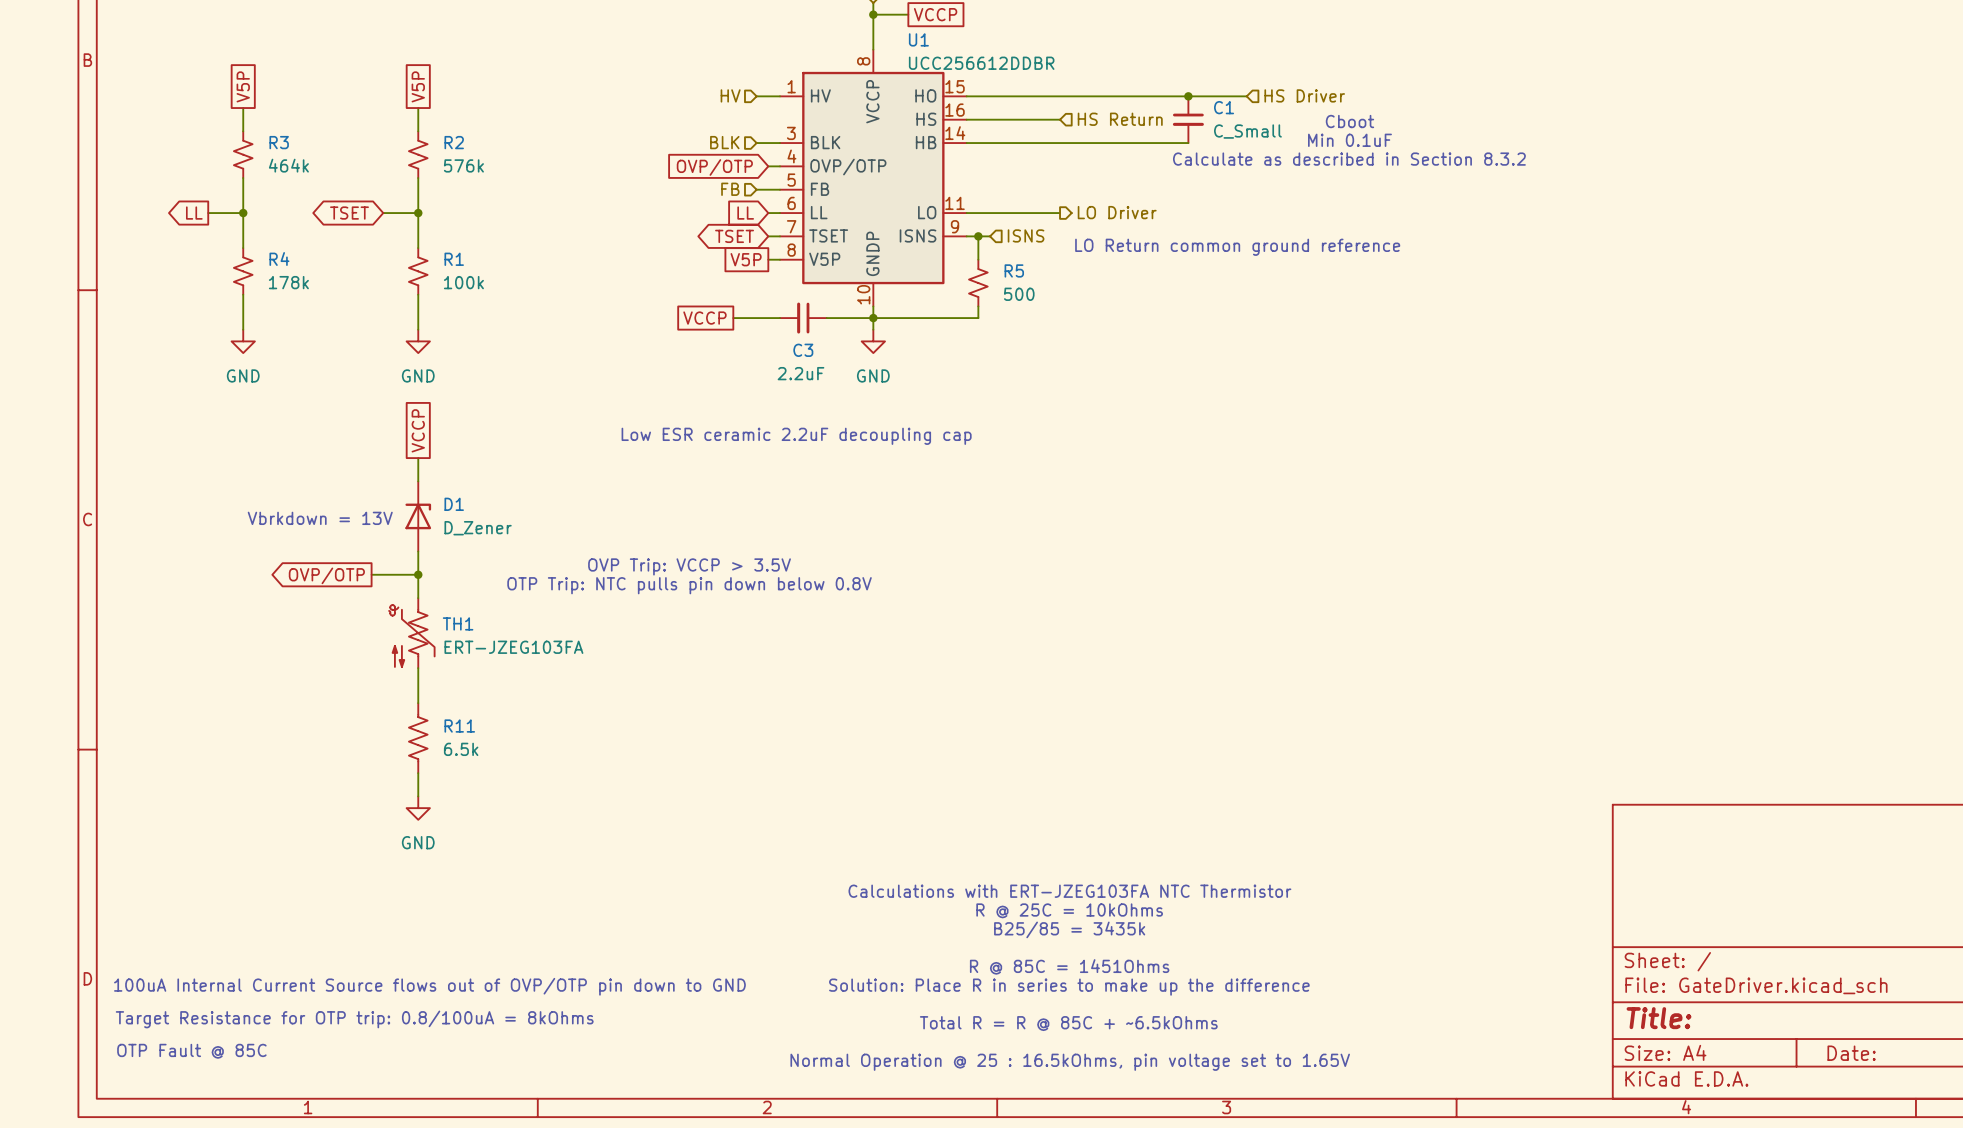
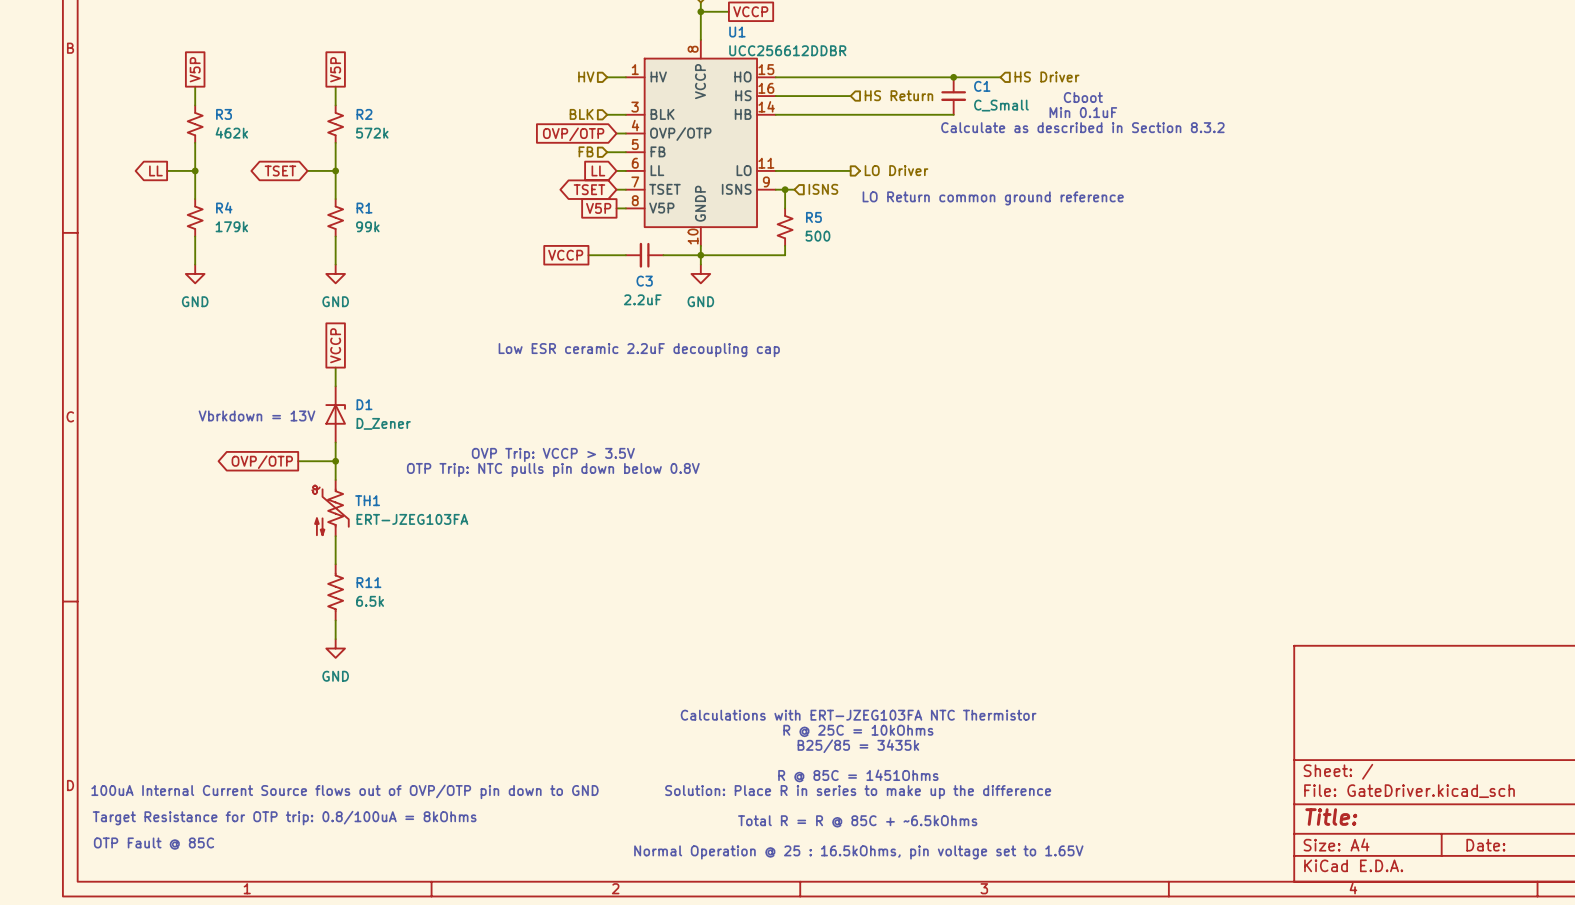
R3 value: 464k (288, 165) -> 462k (231, 132)
R2 value: 576k (463, 165) -> 572k (372, 133)
R4 value: 178k (288, 282) -> 179k (231, 226)
R1 value: 100k (463, 282) -> 99k (367, 226)

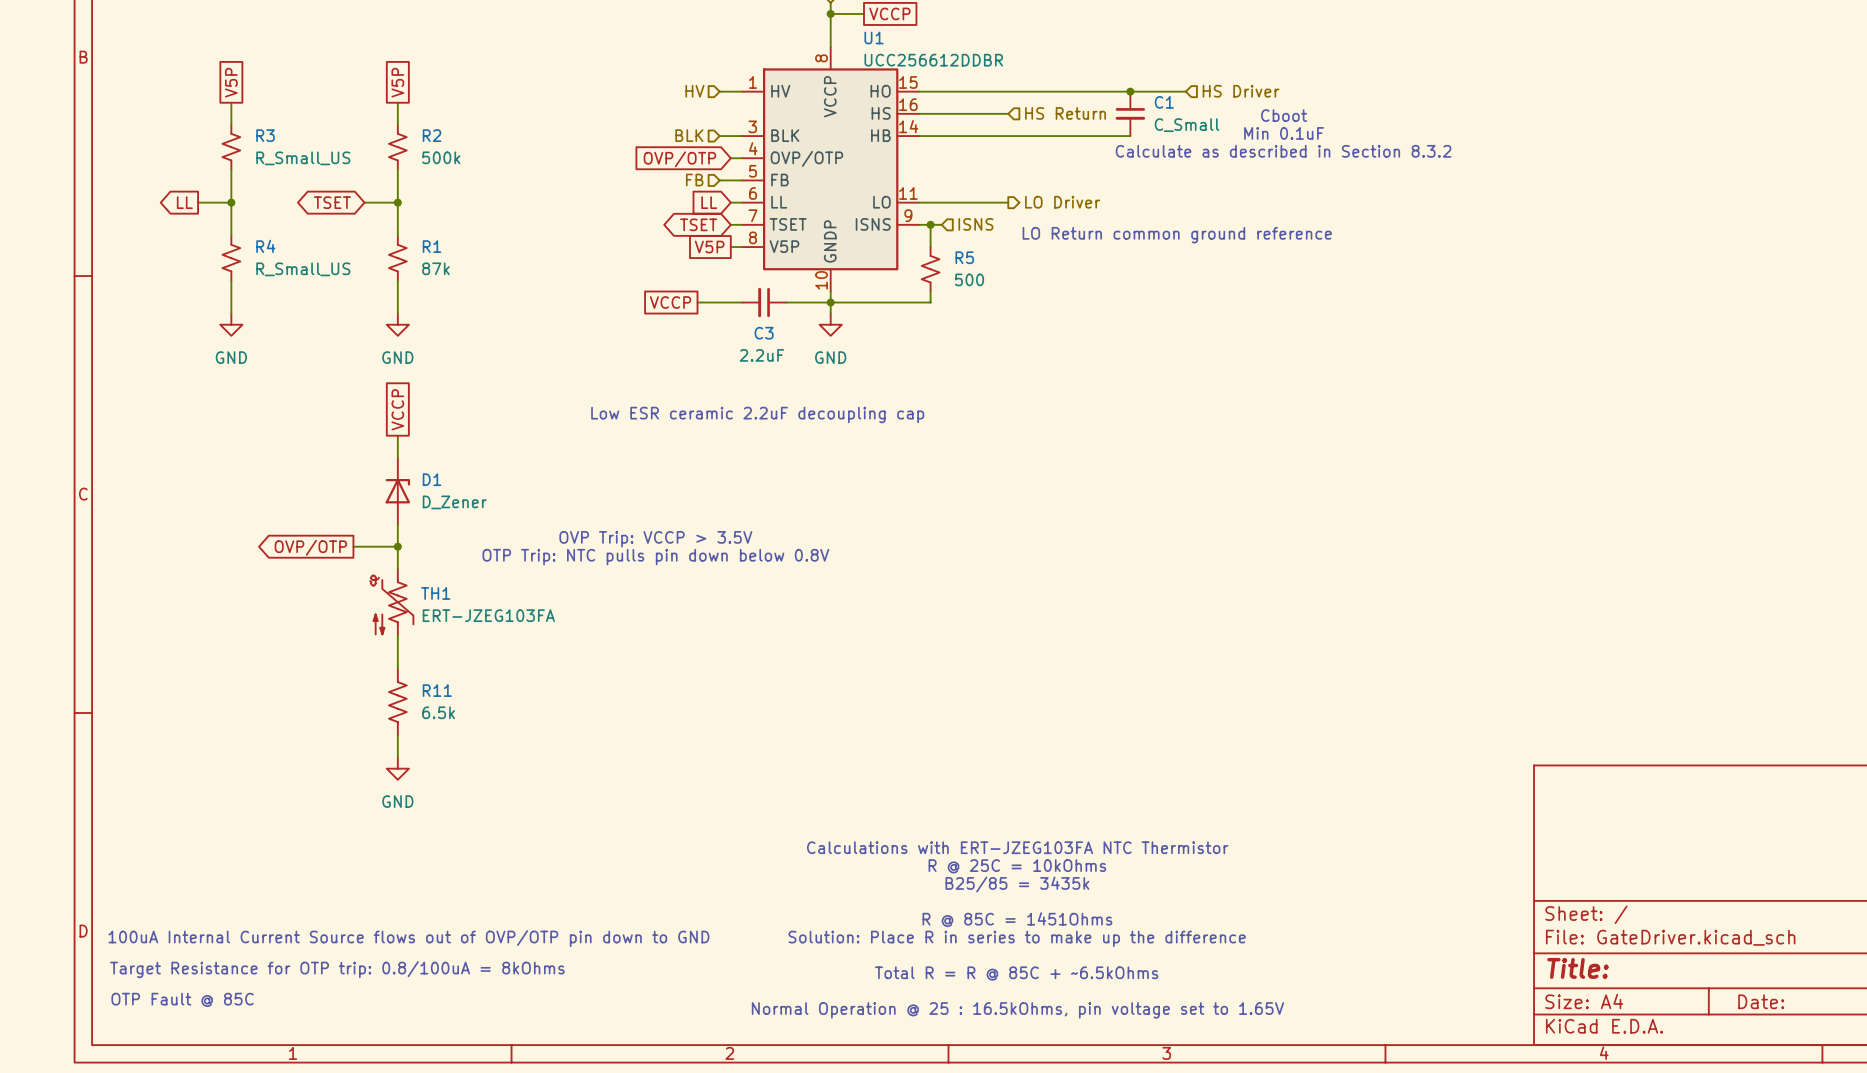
R3 value: 462k (231, 132) -> R_Small_US (303, 158)
R2 value: 572k (372, 133) -> 500k (441, 157)
R4 value: 179k (231, 226) -> R_Small_US (303, 269)
R1 value: 99k (367, 226) -> 87k (435, 268)
text: Vbrkdown = 13V (256, 415) -> none

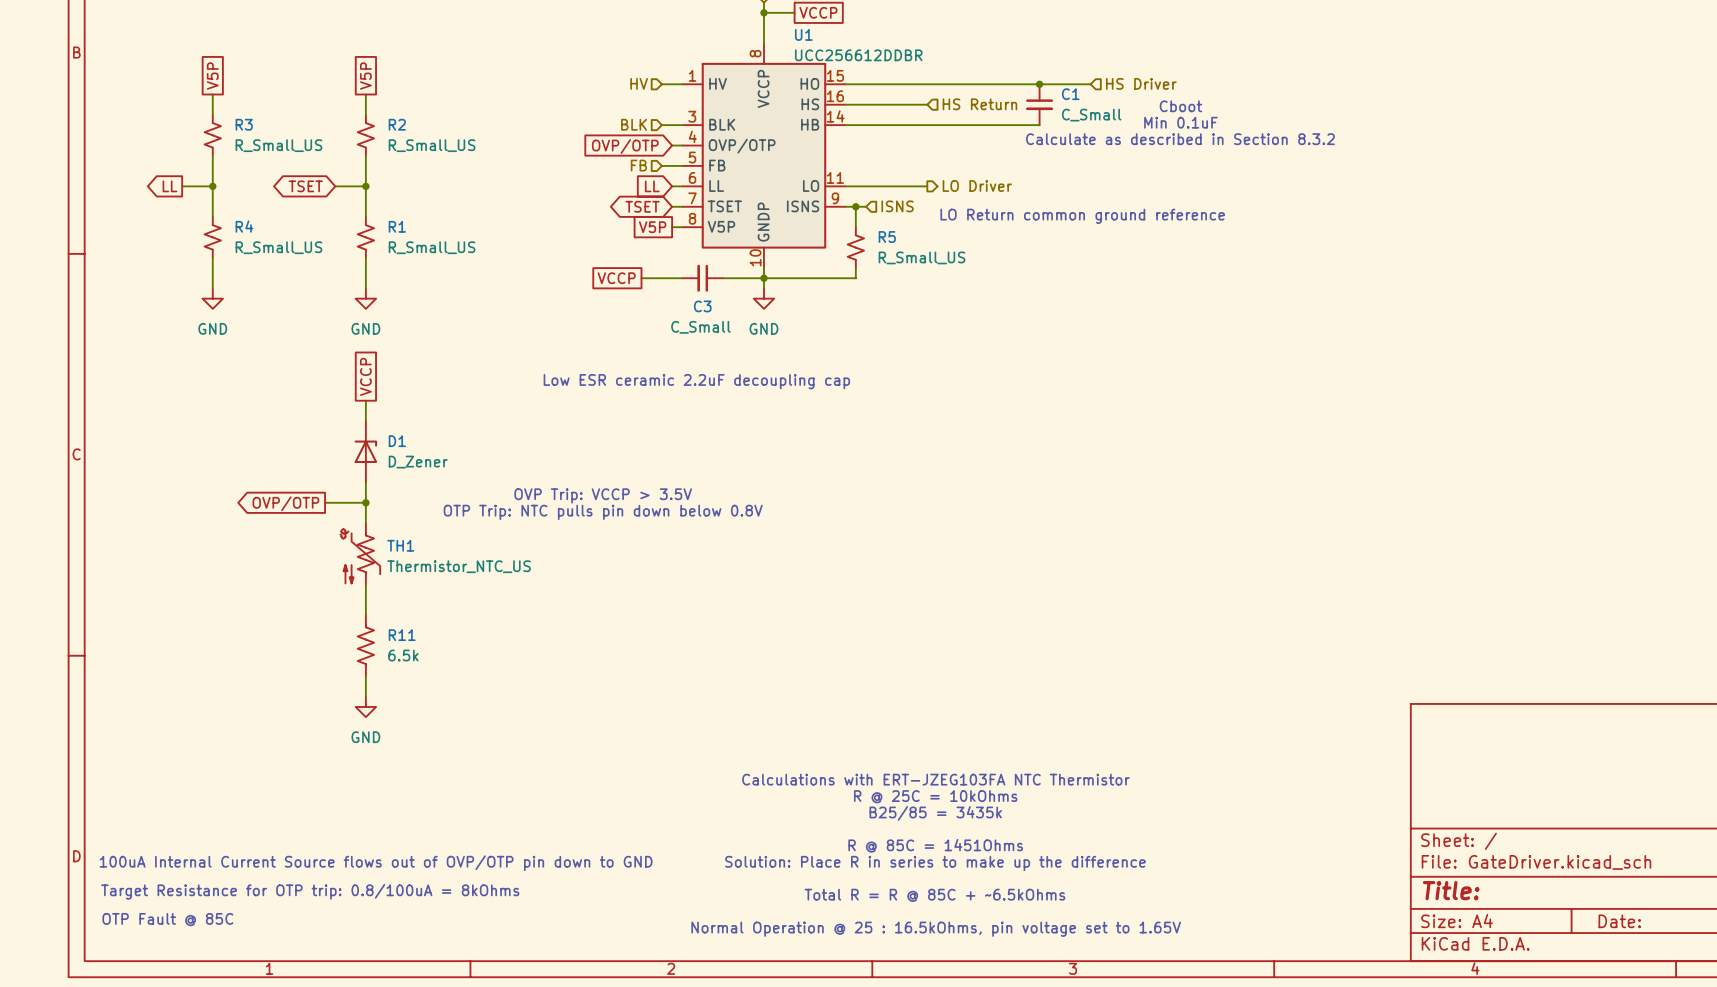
R2 value: 500k (441, 157) -> R_Small_US (432, 145)
R1 value: 87k (435, 268) -> R_Small_US (432, 247)
R5 value: 500 (969, 279) -> R_Small_US (922, 257)
C3 value: 2.2uF (761, 355) -> C_Small (700, 327)
TH1 value: ERT-JZEG103FA (488, 615) -> Thermistor_NTC_US (459, 566)

